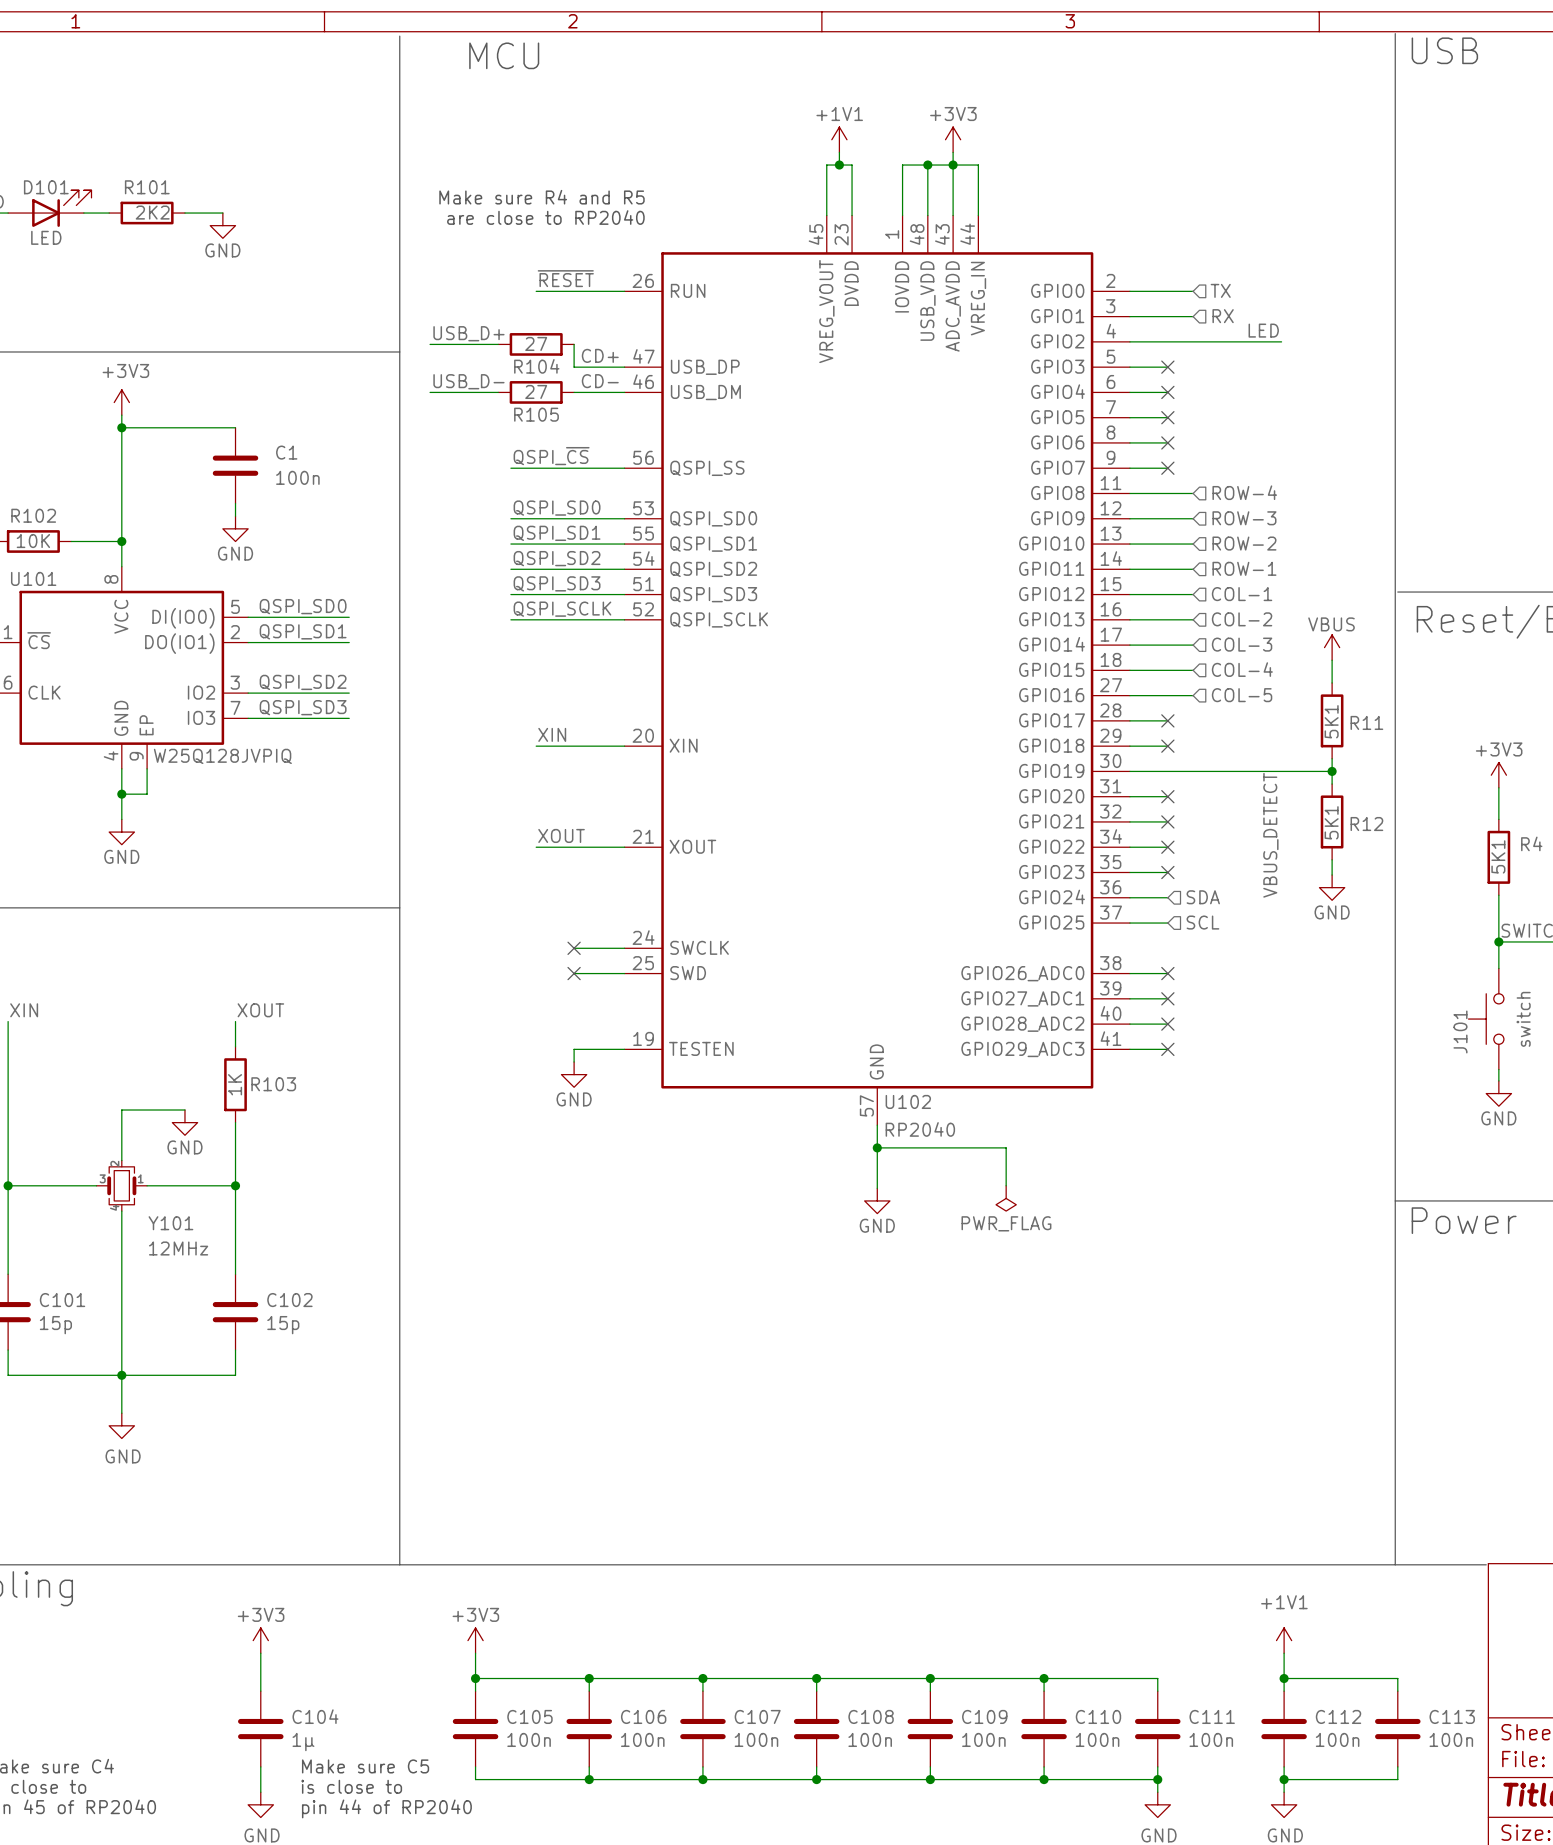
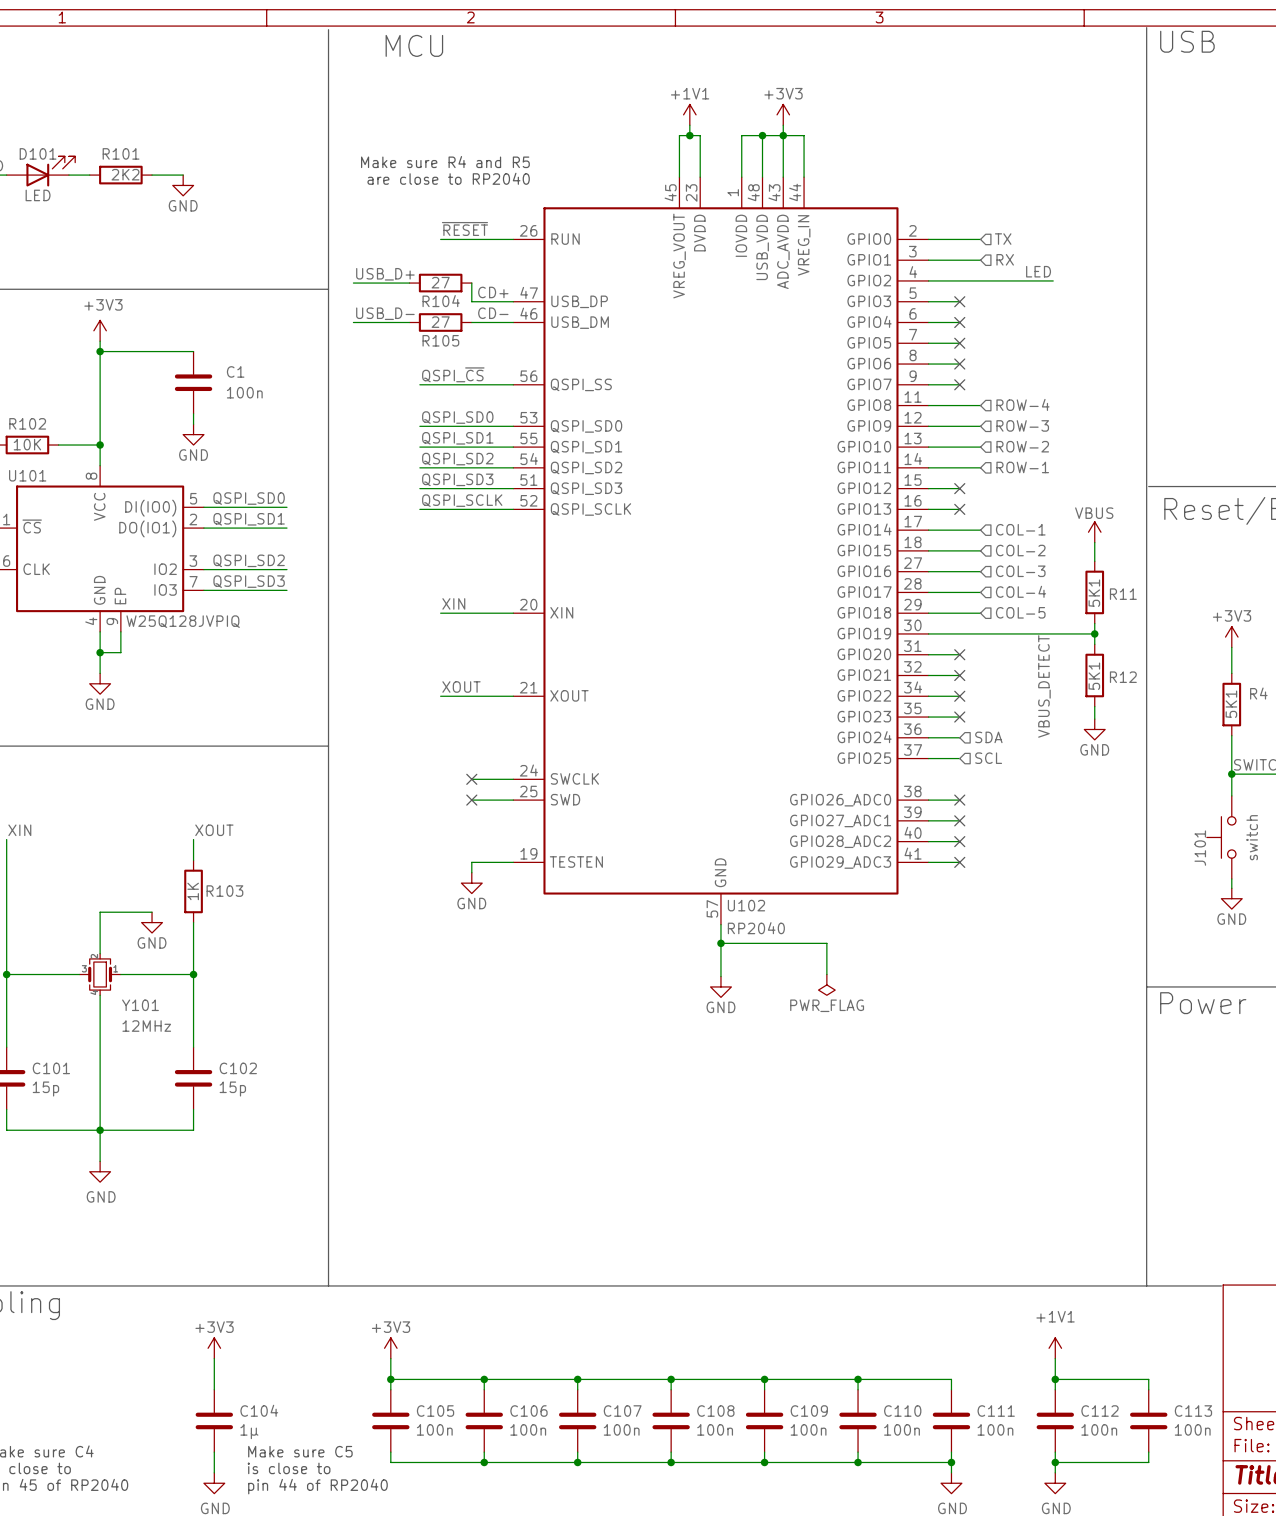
wire: (1167, 594) (1193, 594) -> (959, 592) (980, 592)
no-connect mark: none -> (959, 488)
hierarchical label: COL-1 (1242, 594) -> none
wire: (1167, 619) (1193, 619) -> (959, 613) (980, 613)
no-connect mark: none -> (959, 509)
hierarchical label: COL-2 (1242, 619) -> none
hierarchical label: COL-3 (1242, 644) -> COL-1 (1020, 529)
hierarchical label: COL-4 (1242, 669) -> COL-2 (1020, 550)
hierarchical label: COL-5 (1242, 695) -> COL-3 (1020, 571)
no-connect mark: (1167, 720) -> none
hierarchical label: none -> COL-4 (1020, 591)
hierarchical label: none -> COL-5 (1020, 612)
no-connect mark: (1167, 746) -> none

